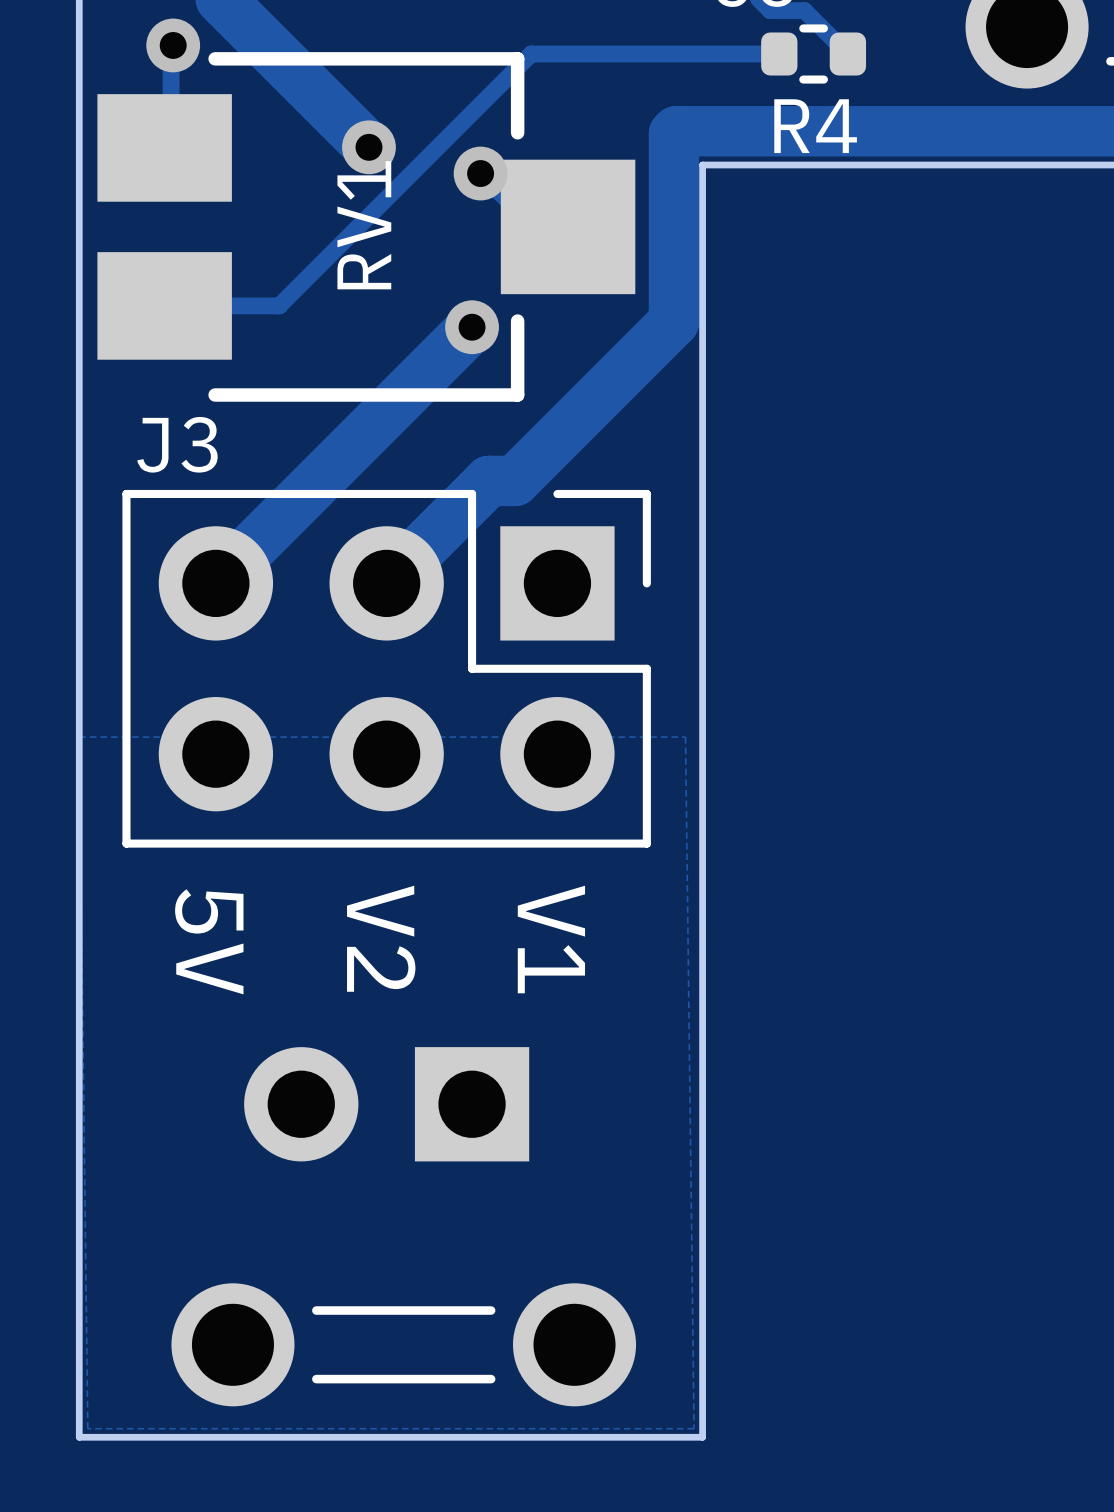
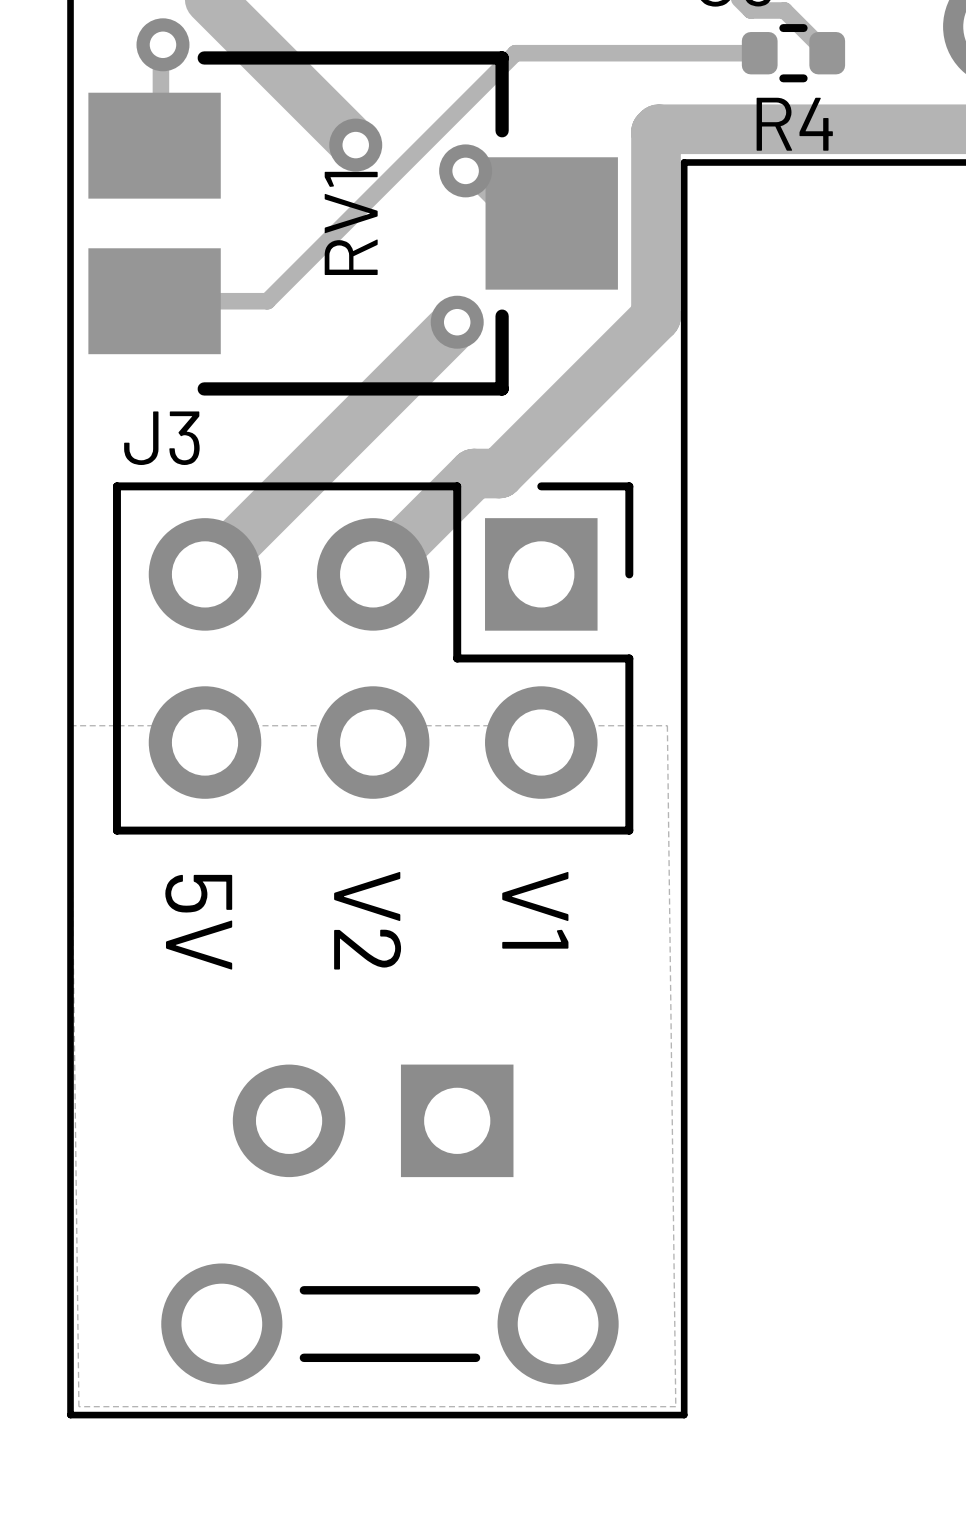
part position: (386, 1104) -> (373, 1120)

